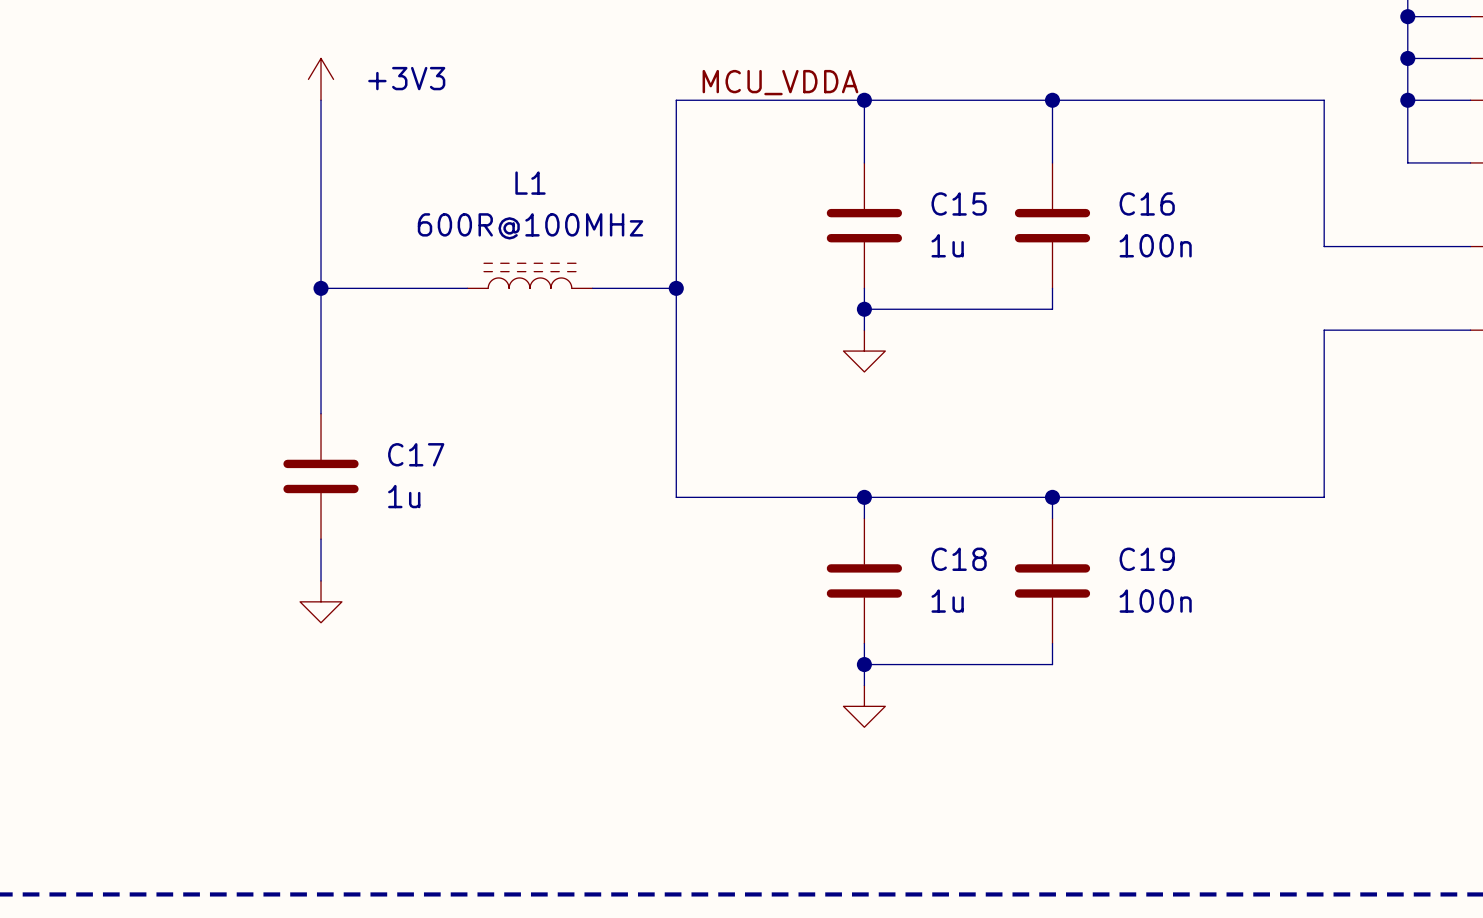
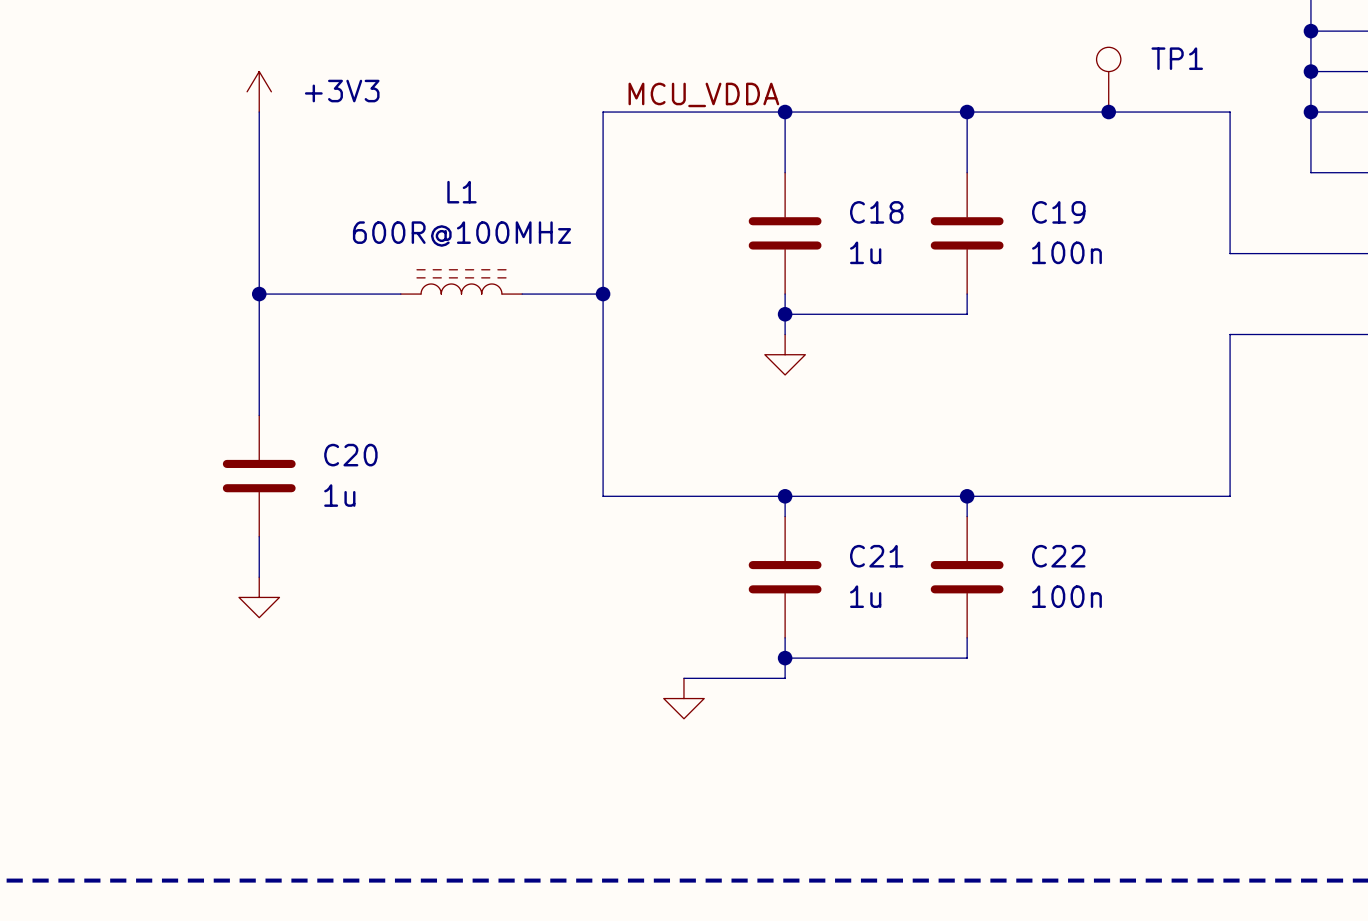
TP1: none -> (1108, 79)
junction: none -> (1108, 112)
C15 name: C15 (959, 203) -> C18 (876, 212)
C16 name: C16 (1147, 203) -> C19 (1058, 212)
C17 name: C17 (416, 454) -> C20 (350, 455)
C18 name: C18 (959, 559) -> C21 (876, 556)
C19 name: C19 (1147, 559) -> C22 (1058, 556)
wire: none -> (683, 678) (785, 678)
power symbol position: (864, 706) -> (683, 698)

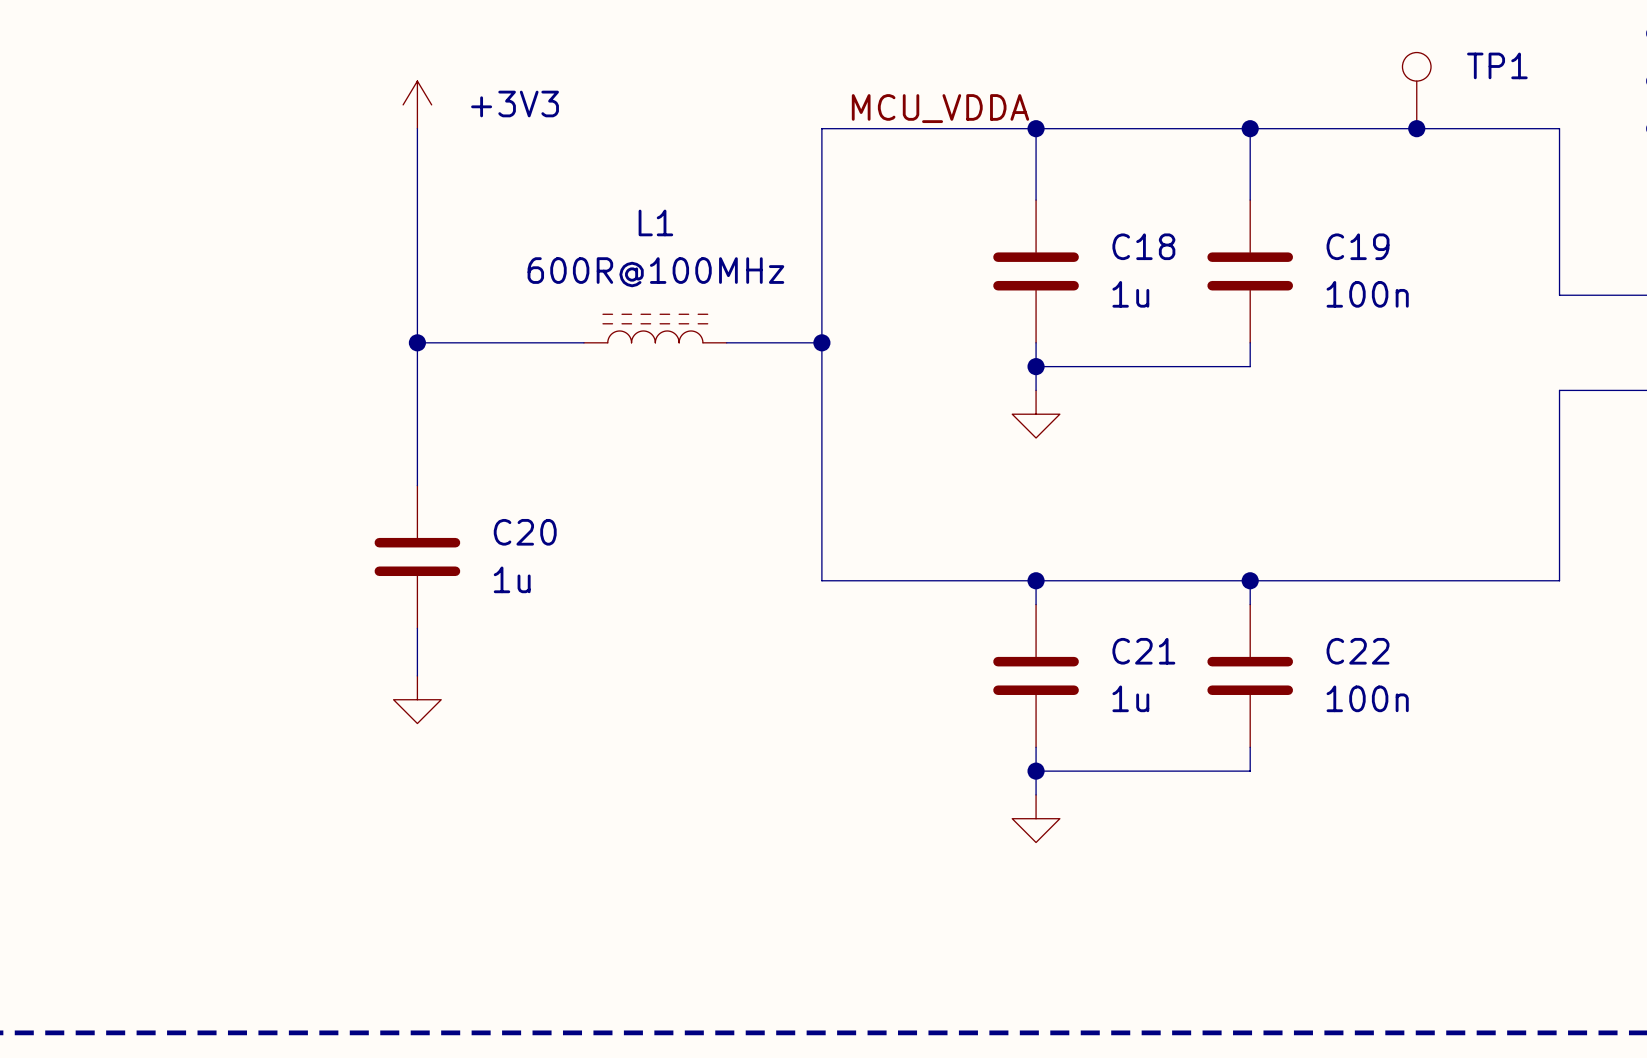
wire: (683, 678) (785, 678) -> none
power symbol position: (683, 698) -> (1036, 818)

